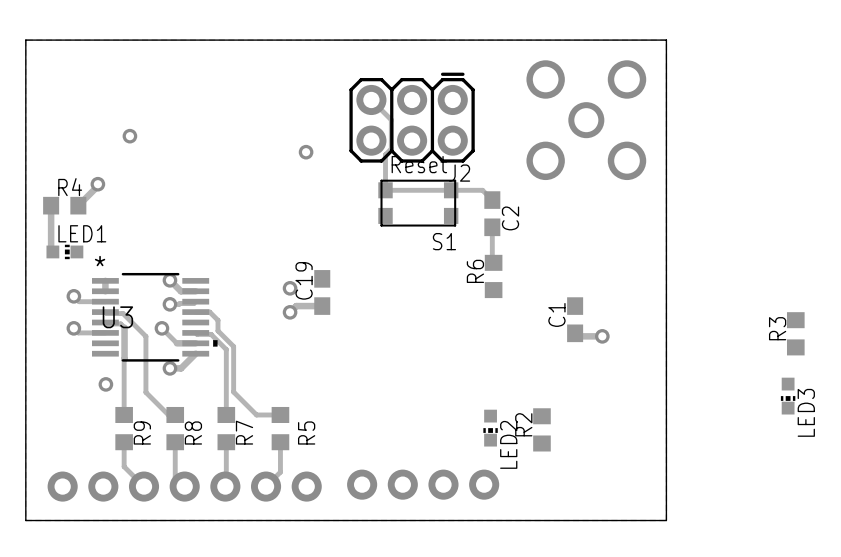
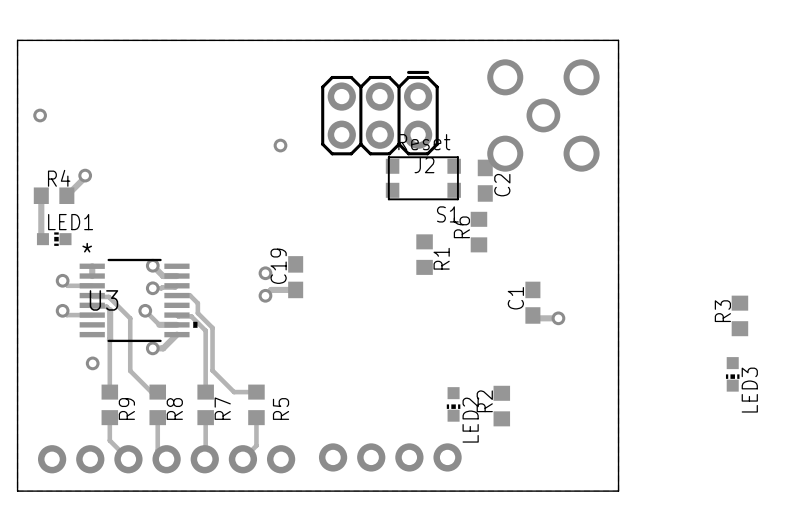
track: (371, 99) (391, 119) (391, 148) (385, 154) (385, 190) (482, 190) (492, 200) -> none
via position: (129, 136) -> (40, 115)
S1 position: (418, 203) -> (423, 178)
C2 position: (492, 213) -> (485, 180)
track: (492, 227) (493, 262) -> none
R1: none -> (424, 254)
R6 position: (493, 276) -> (478, 232)

